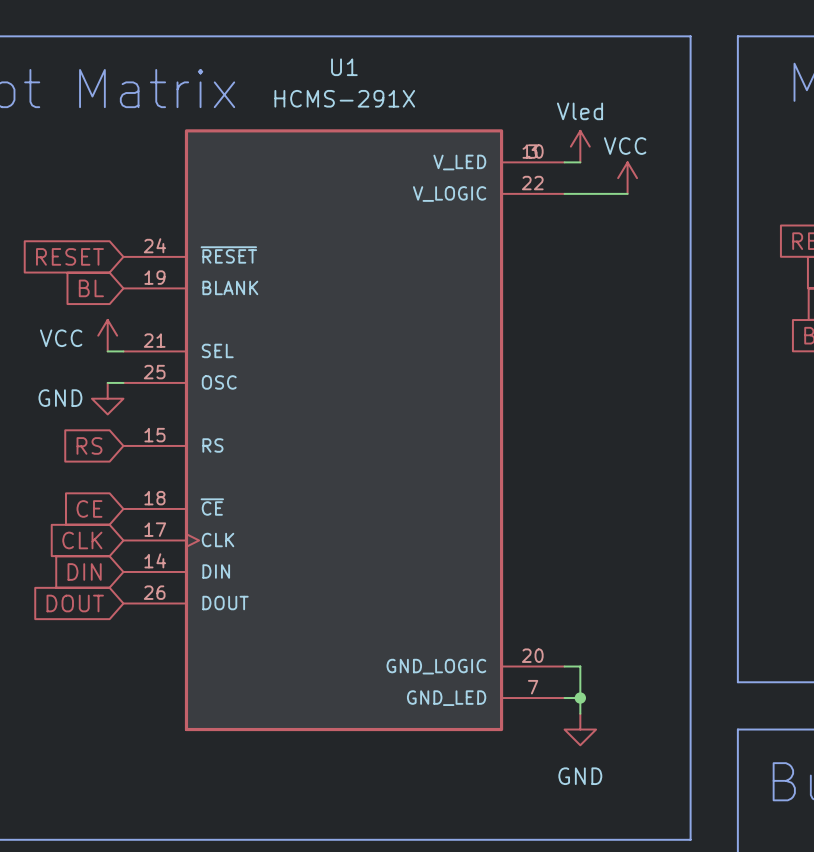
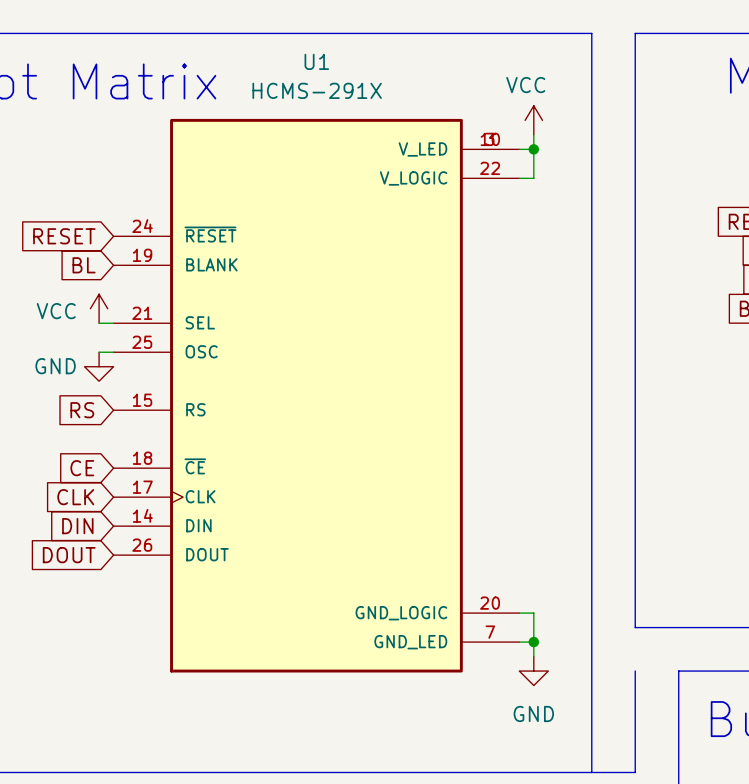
line: (643, 36) (690, 36) -> (678, 33) (635, 33)
line: none -> (591, 33) (591, 772)
line: (737, 36) (737, 682) -> none
power symbol: Vled (580, 146) -> none
power symbol text position: VCC (625, 146) -> VCC (525, 85)
junction: none -> (533, 149)
power symbol position: VCC (627, 178) -> VCC (533, 120)
wire: (580, 193) (627, 193) -> (533, 178) (533, 134)
line: (690, 682) (690, 729) -> (635, 627) (678, 627)

